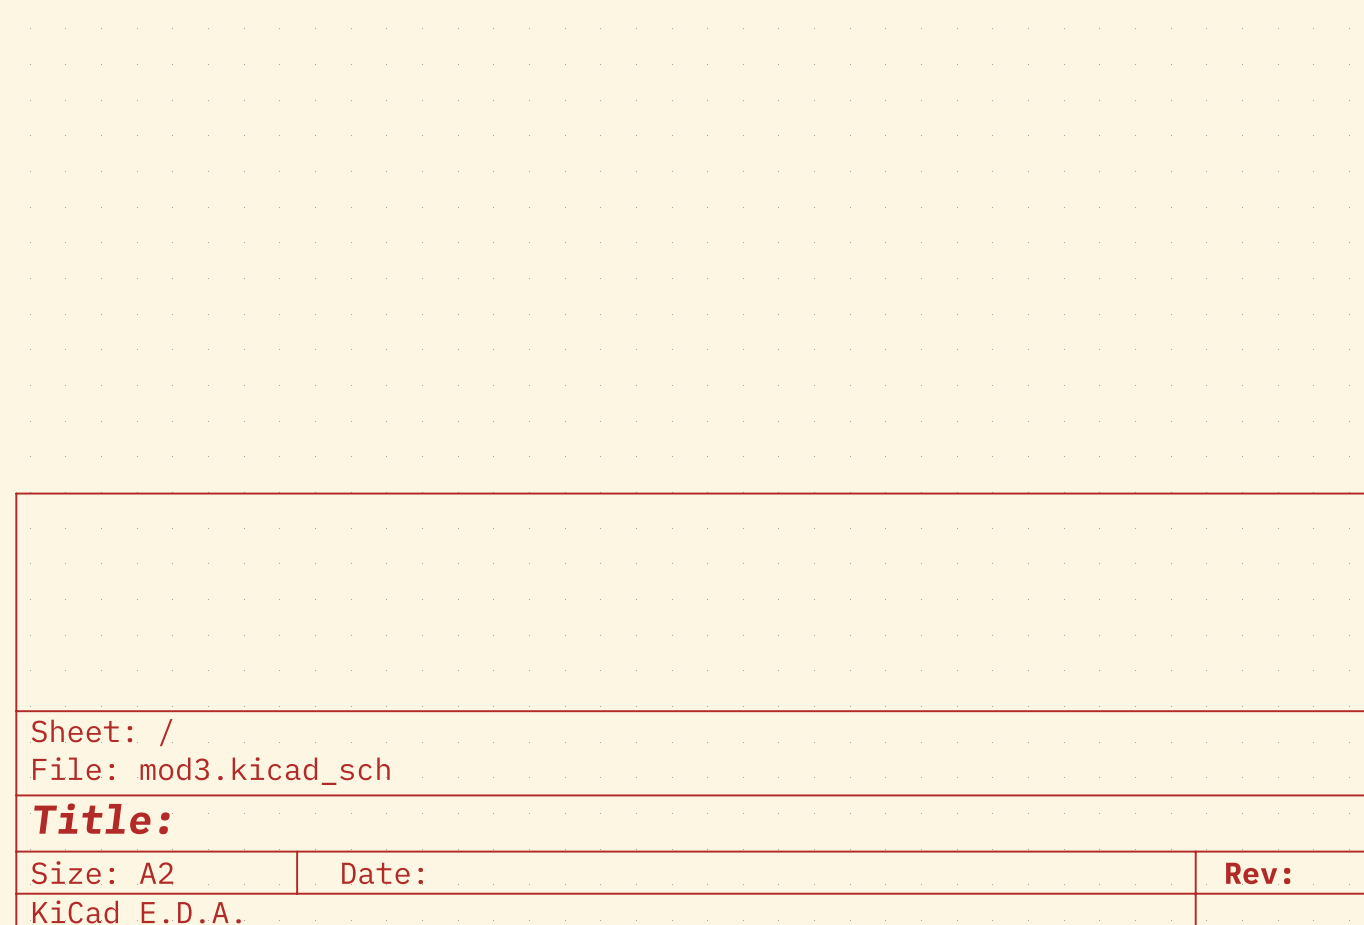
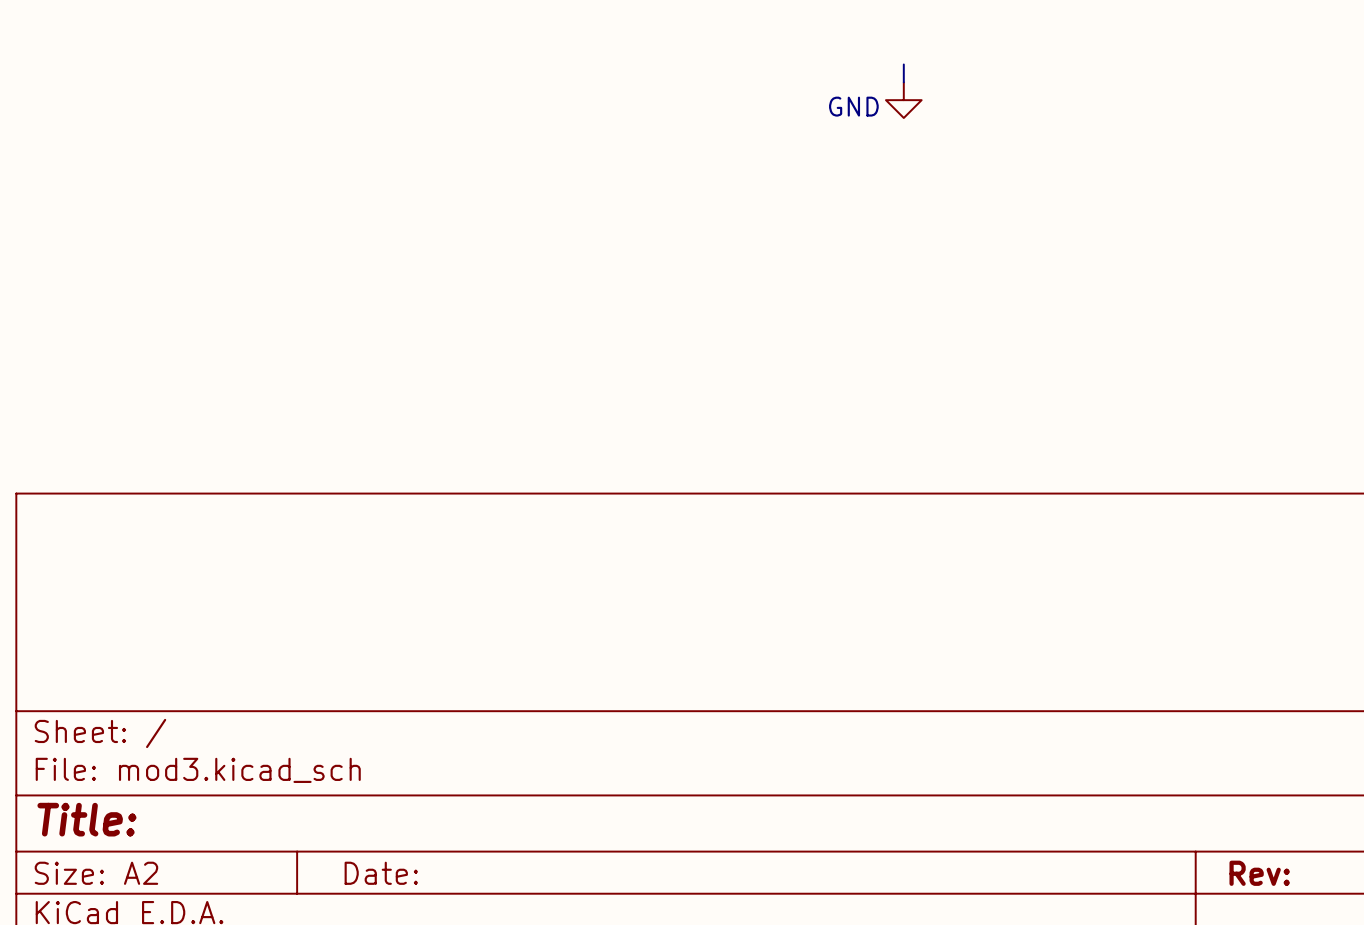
wire: none -> (903, 64) (903, 82)
power symbol: none -> GND (903, 100)

